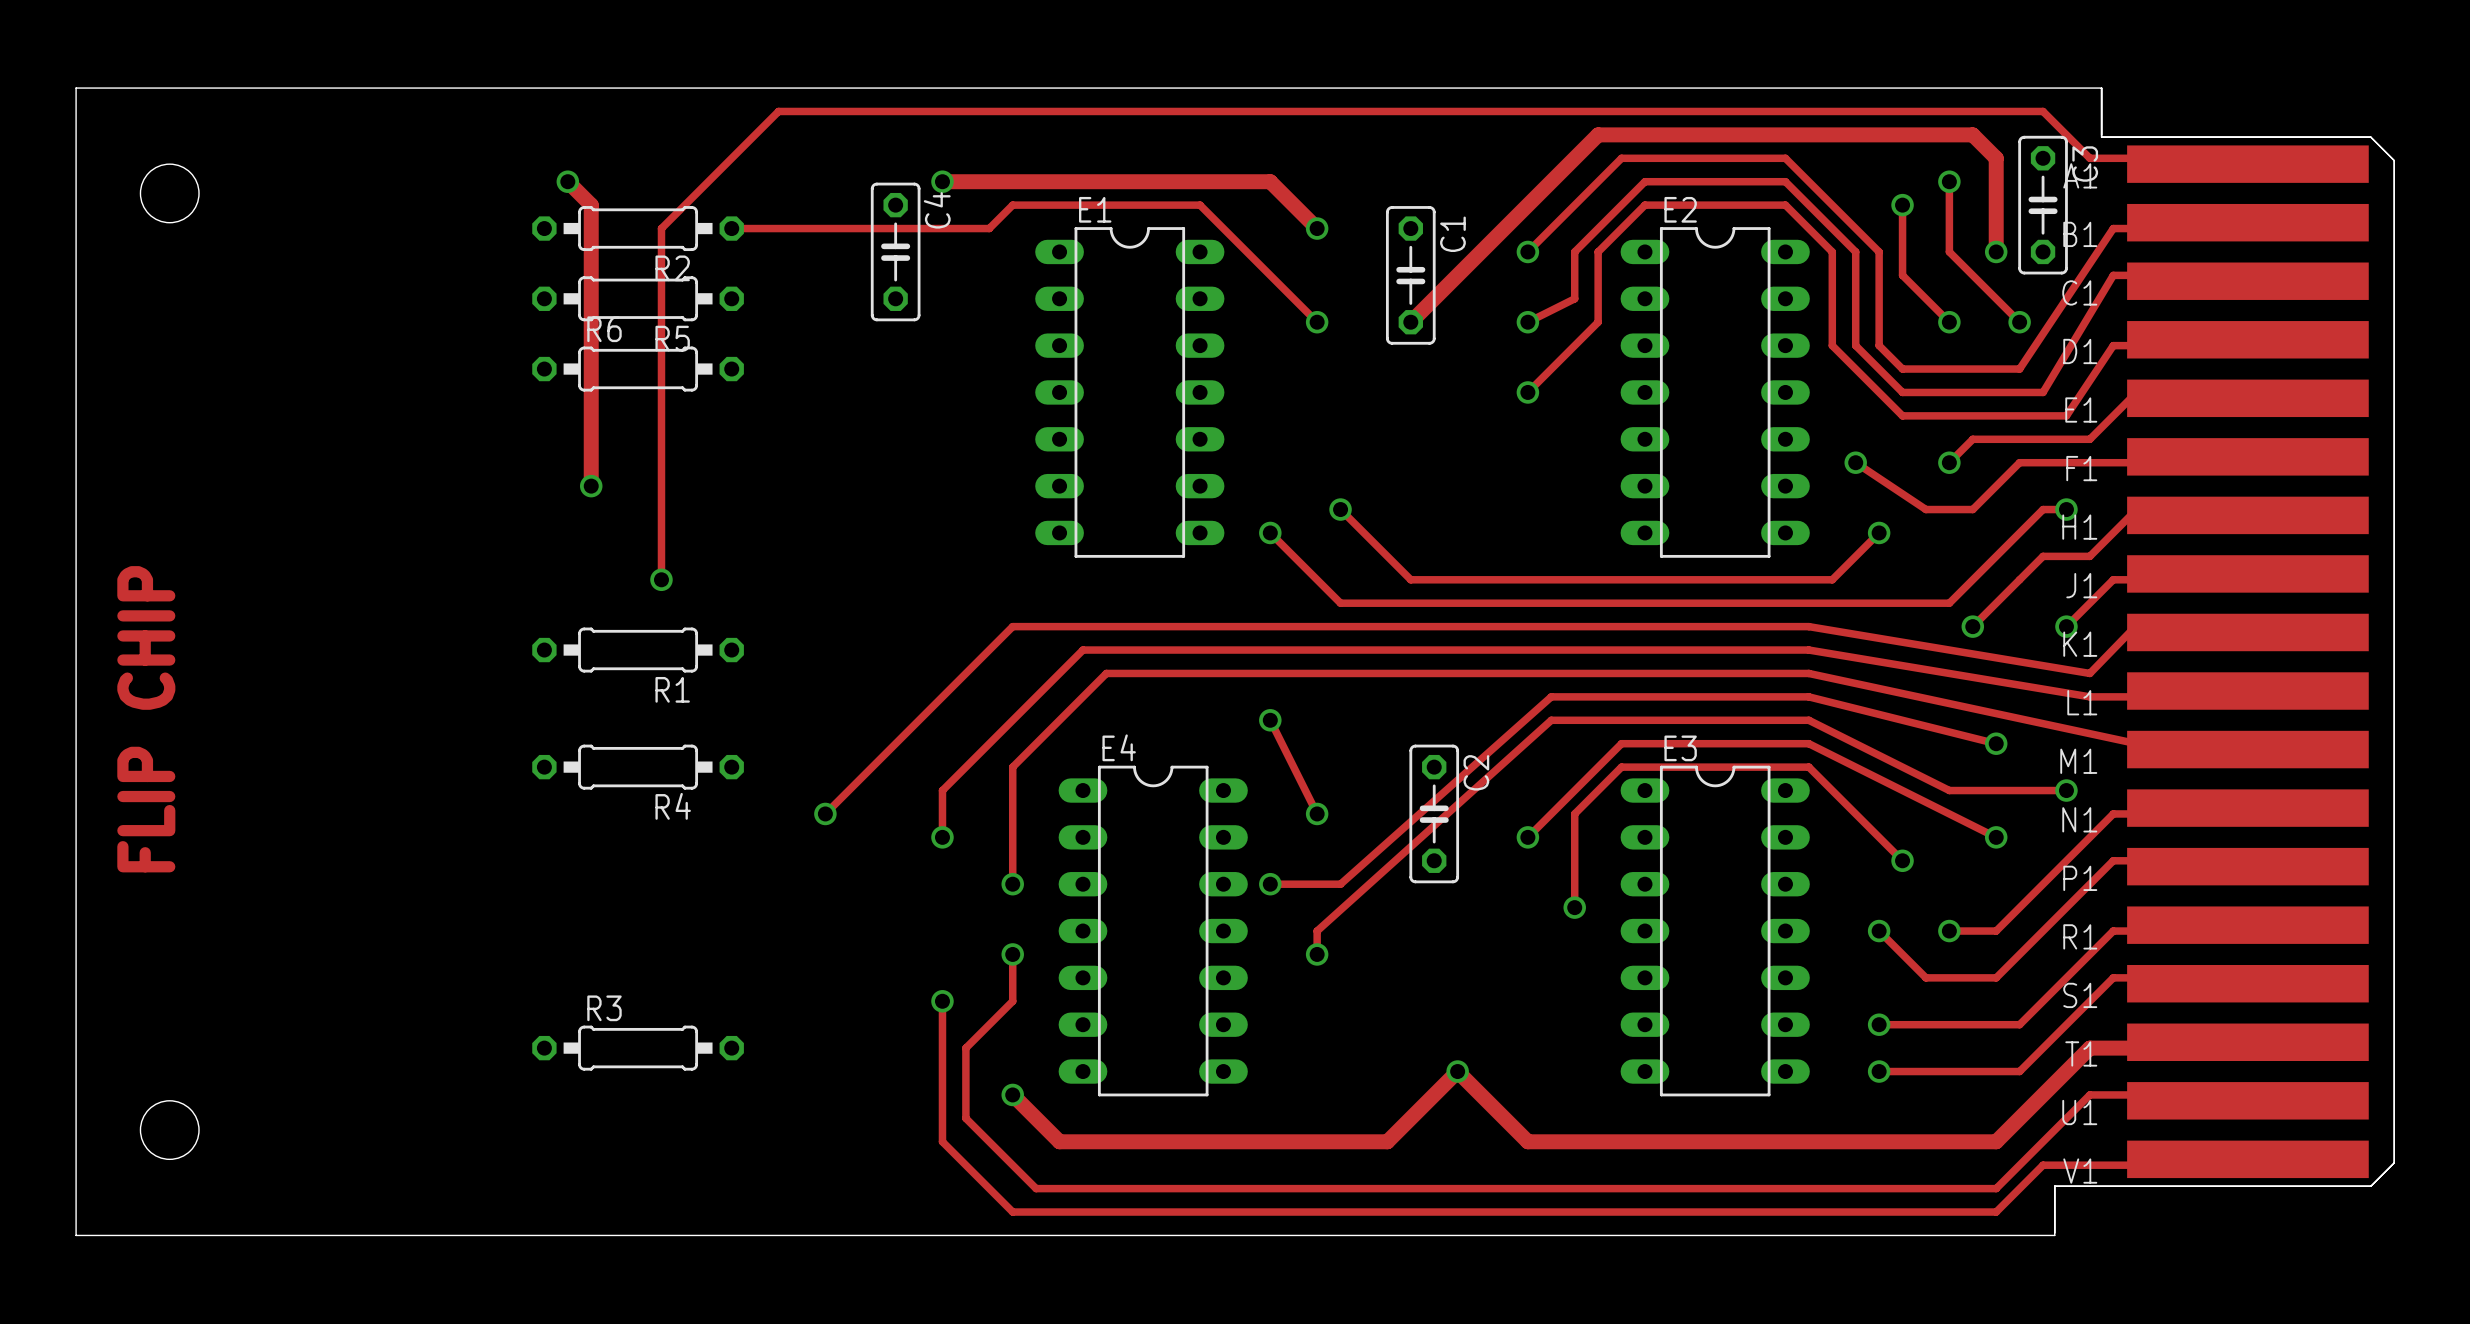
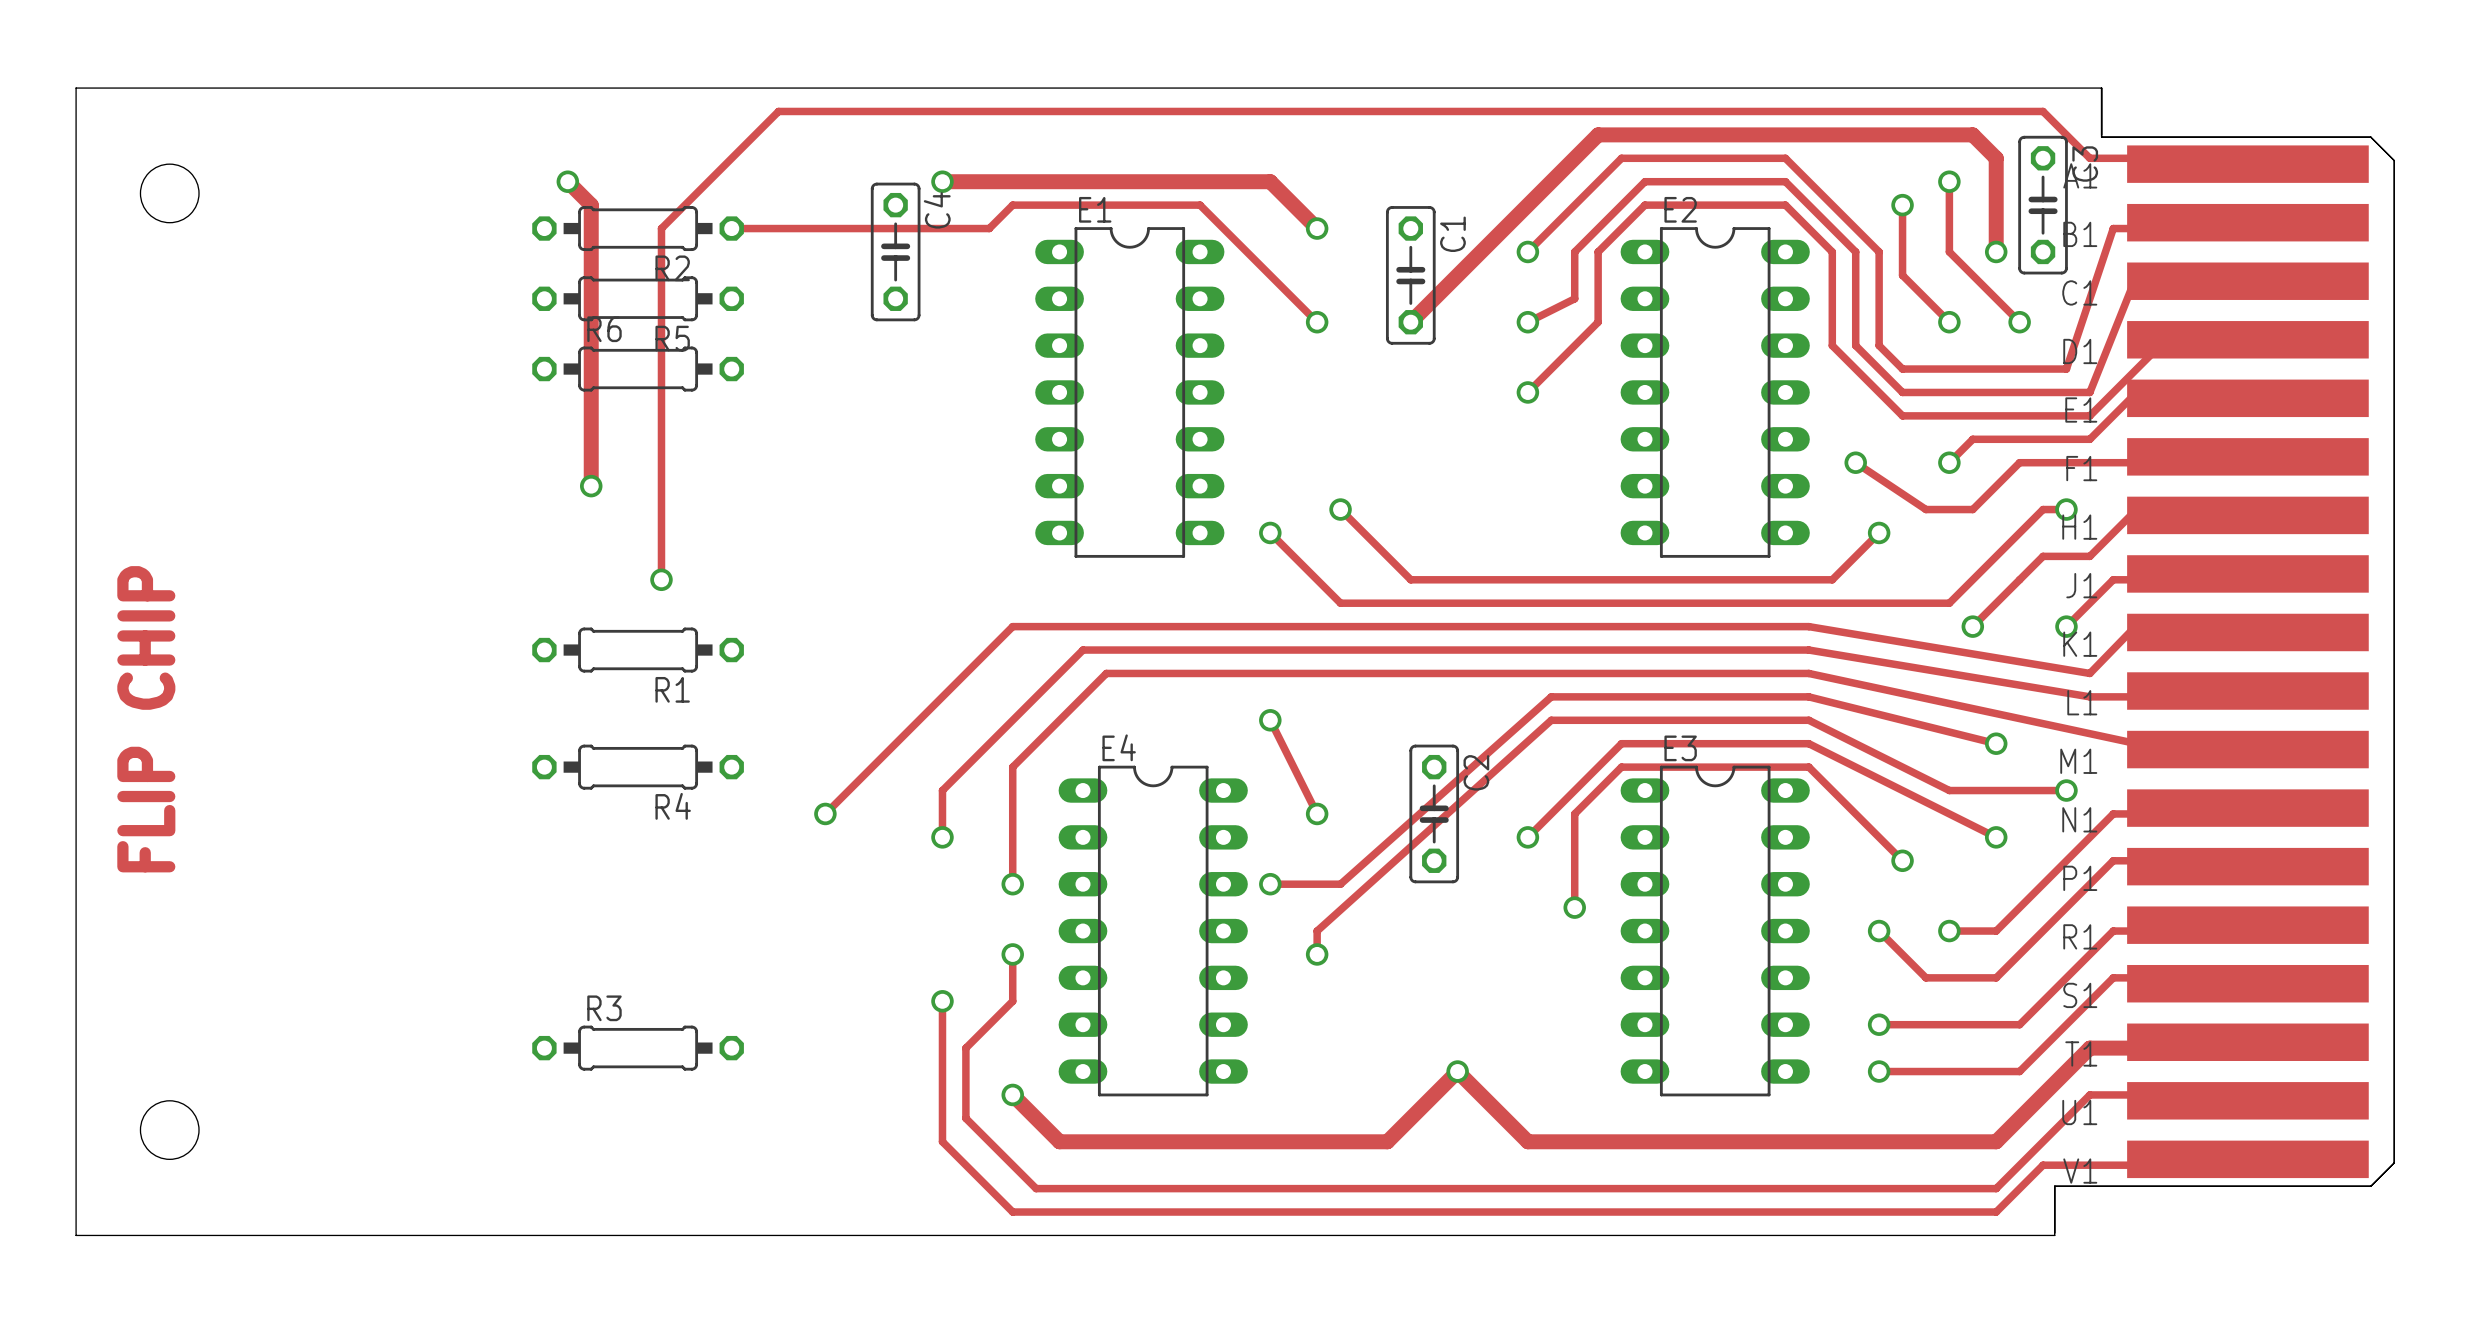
track: (2113, 228) (2019, 369) -> (2113, 228) (2066, 369) (2019, 369)
track: (2136, 275) (2113, 275) (2043, 392) -> (2136, 275) (2089, 392) (2043, 392)
track: (2160, 345) (2113, 345) (2066, 415) -> (2160, 345) (2089, 415) (2066, 415)

